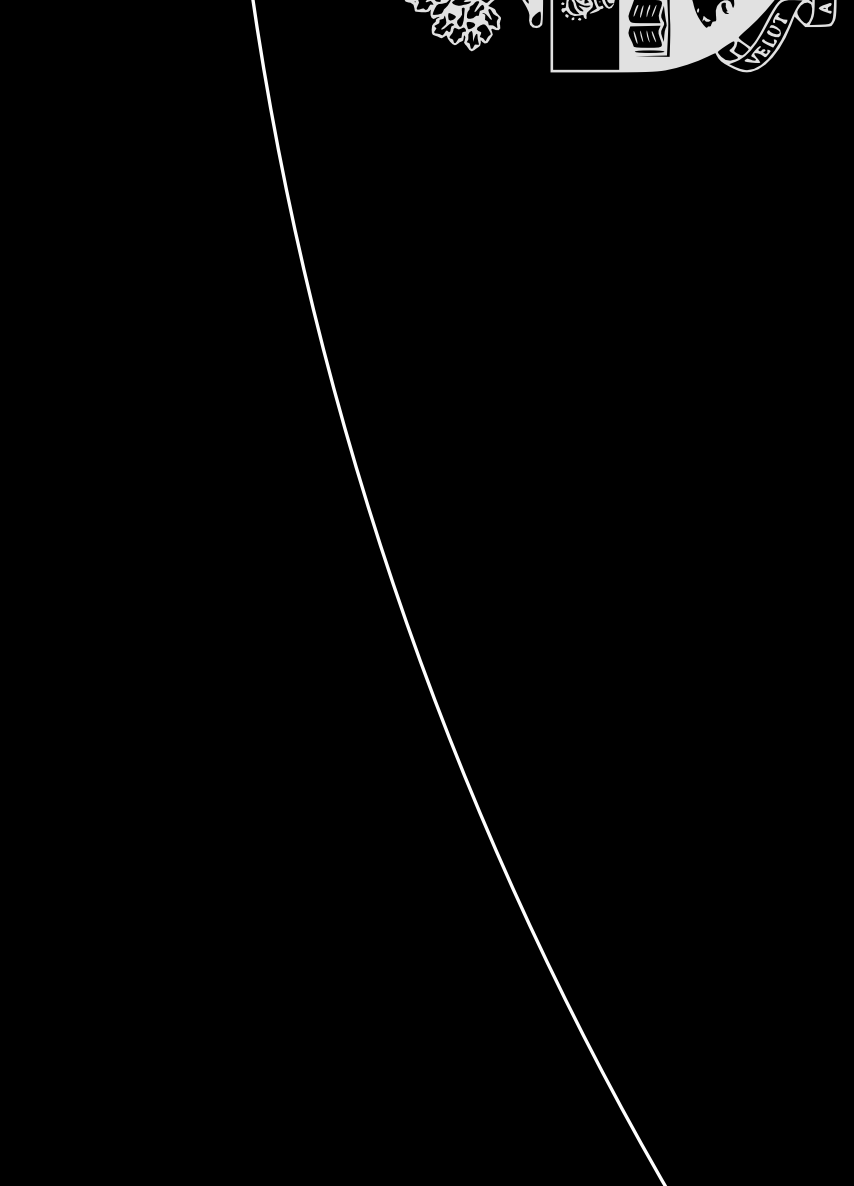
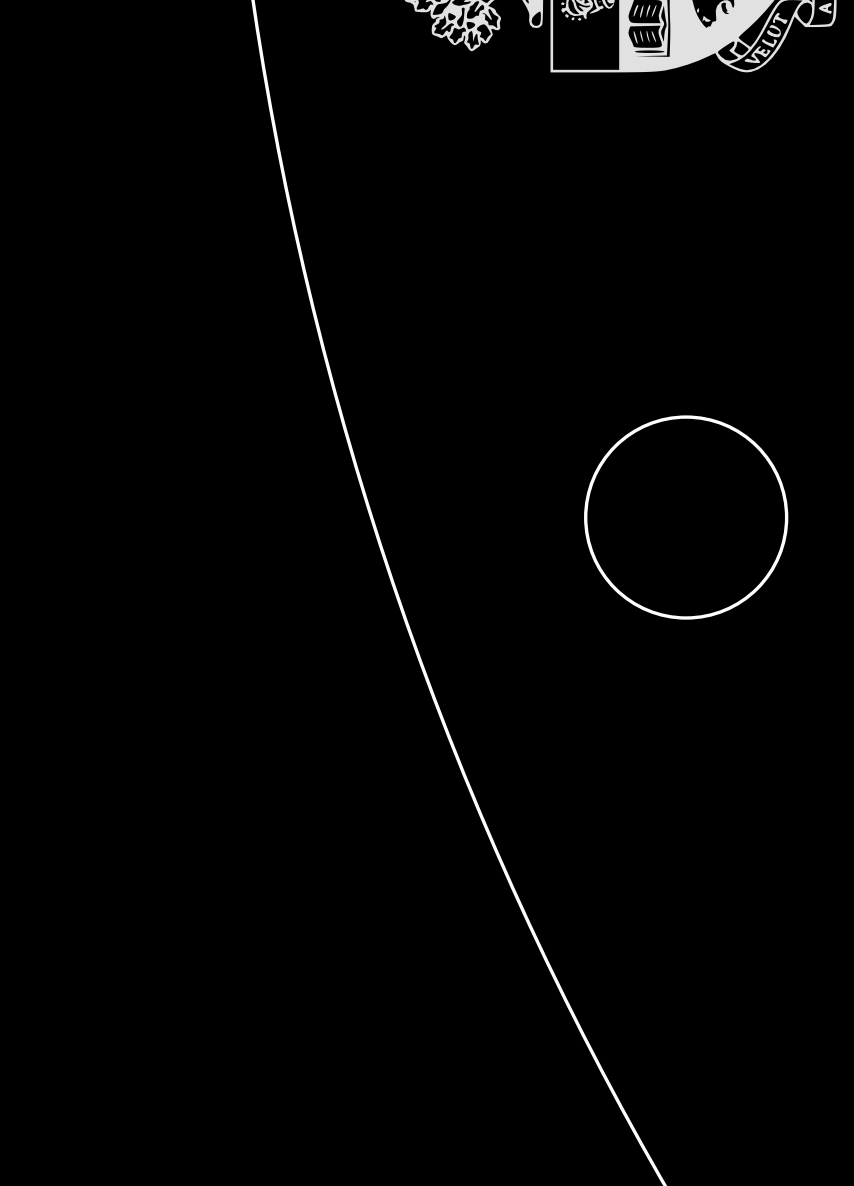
round board edge: none -> [584, 415, 789, 620]

